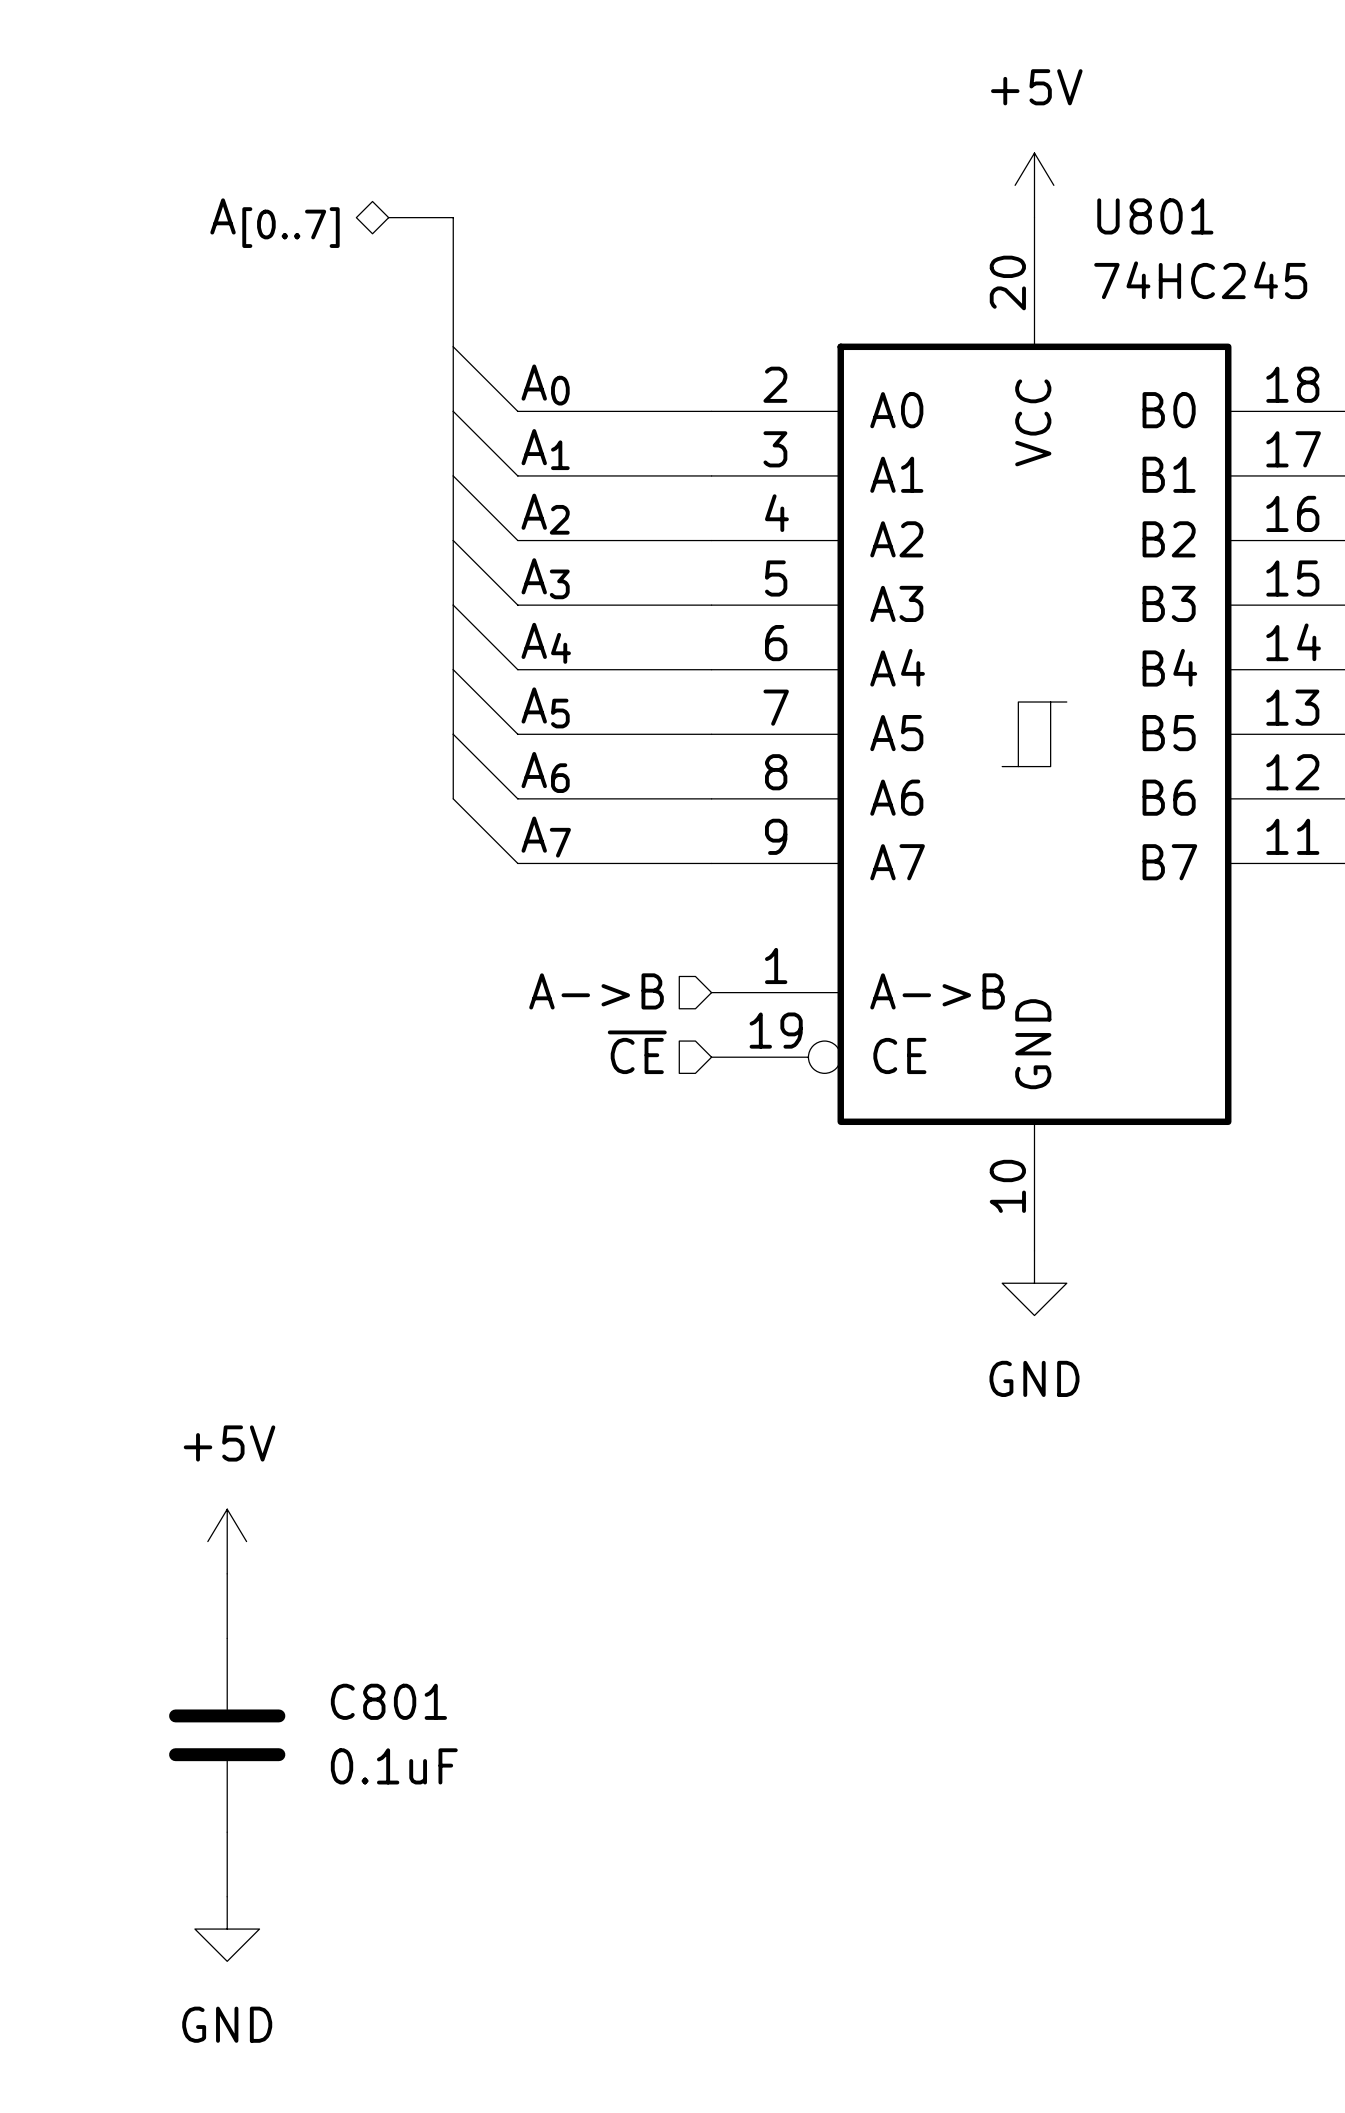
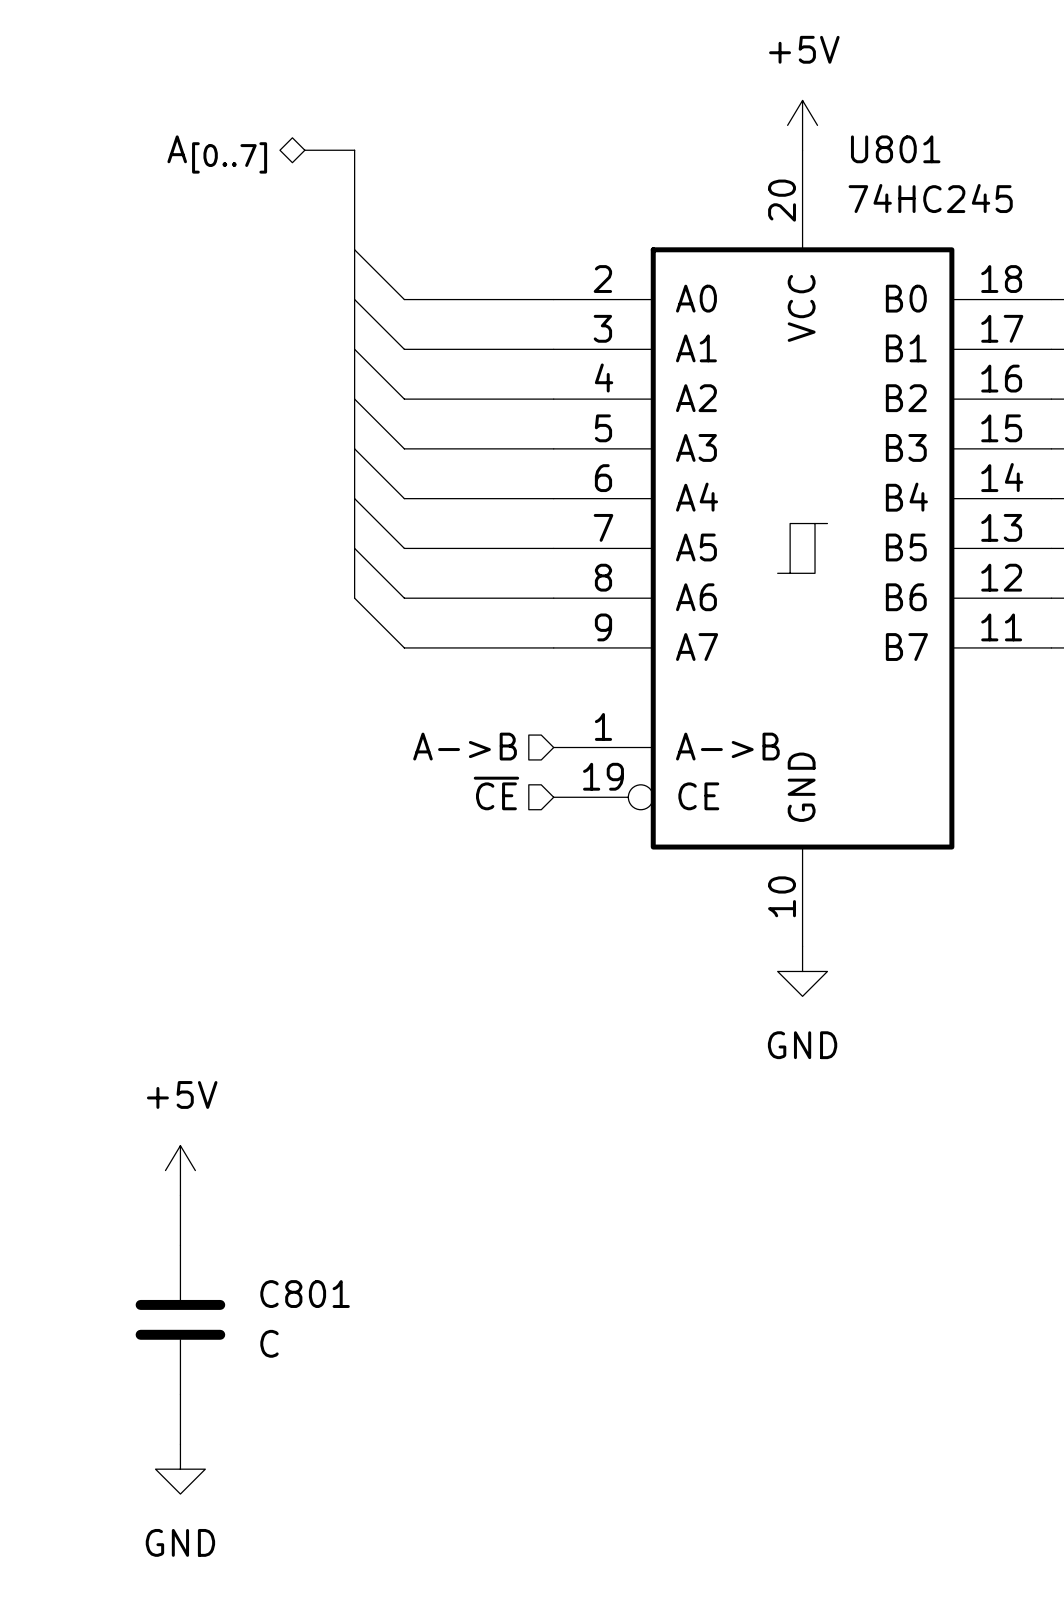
label: A0 (545, 384) -> none
label: A1 (545, 449) -> none
label: A2 (545, 514) -> none
label: A3 (545, 578) -> none
label: A4 (546, 643) -> none
label: A5 (545, 707) -> none
label: A6 (545, 772) -> none
label: A7 (546, 837) -> none
C801 value: 0.1uF (394, 1766) -> C (269, 1343)

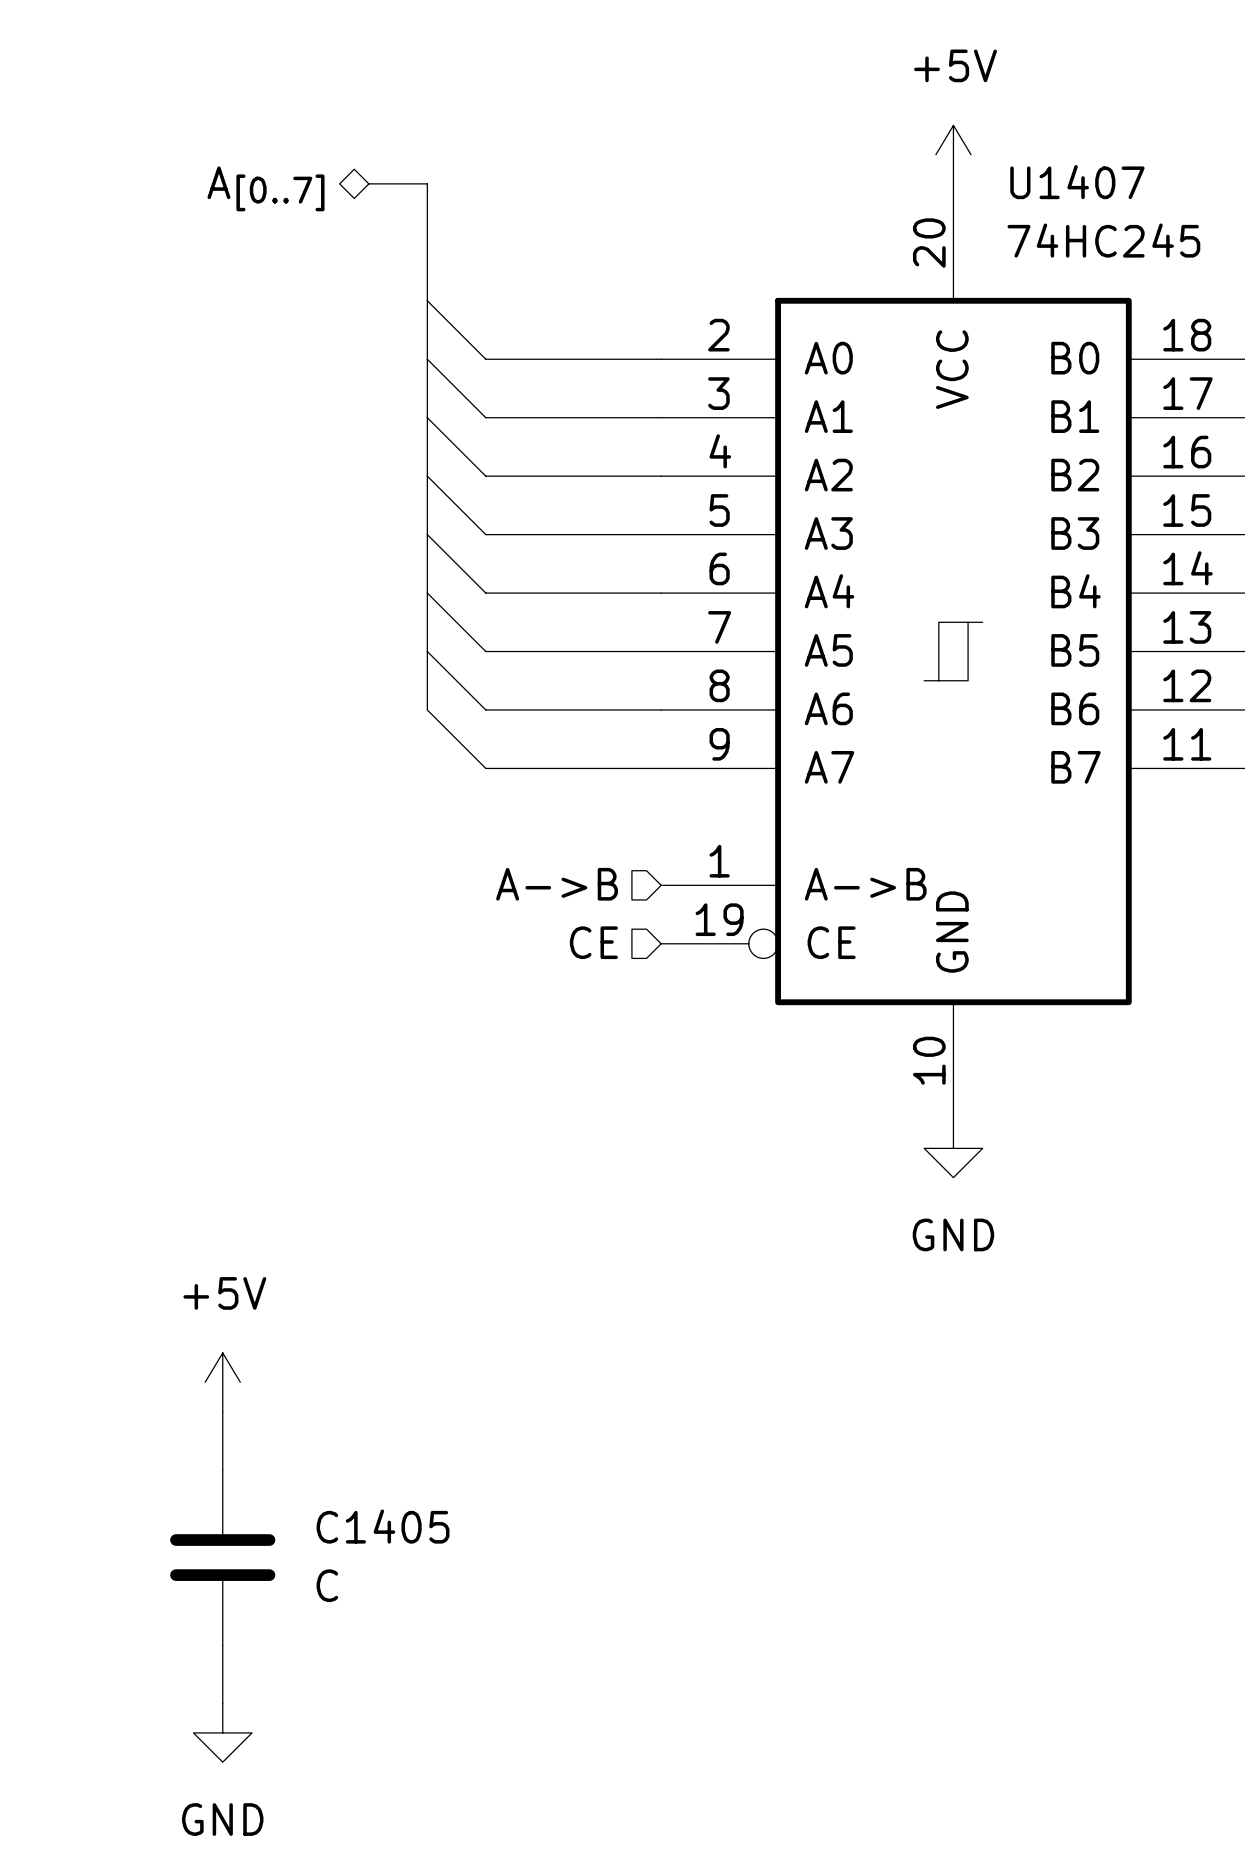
U801 name: U801 (895, 149) -> U1407 (1077, 182)
hierarchical label: ~{CE} (496, 793) -> CE (593, 942)
C801 name: C801 (305, 1294) -> C1405 (383, 1526)

